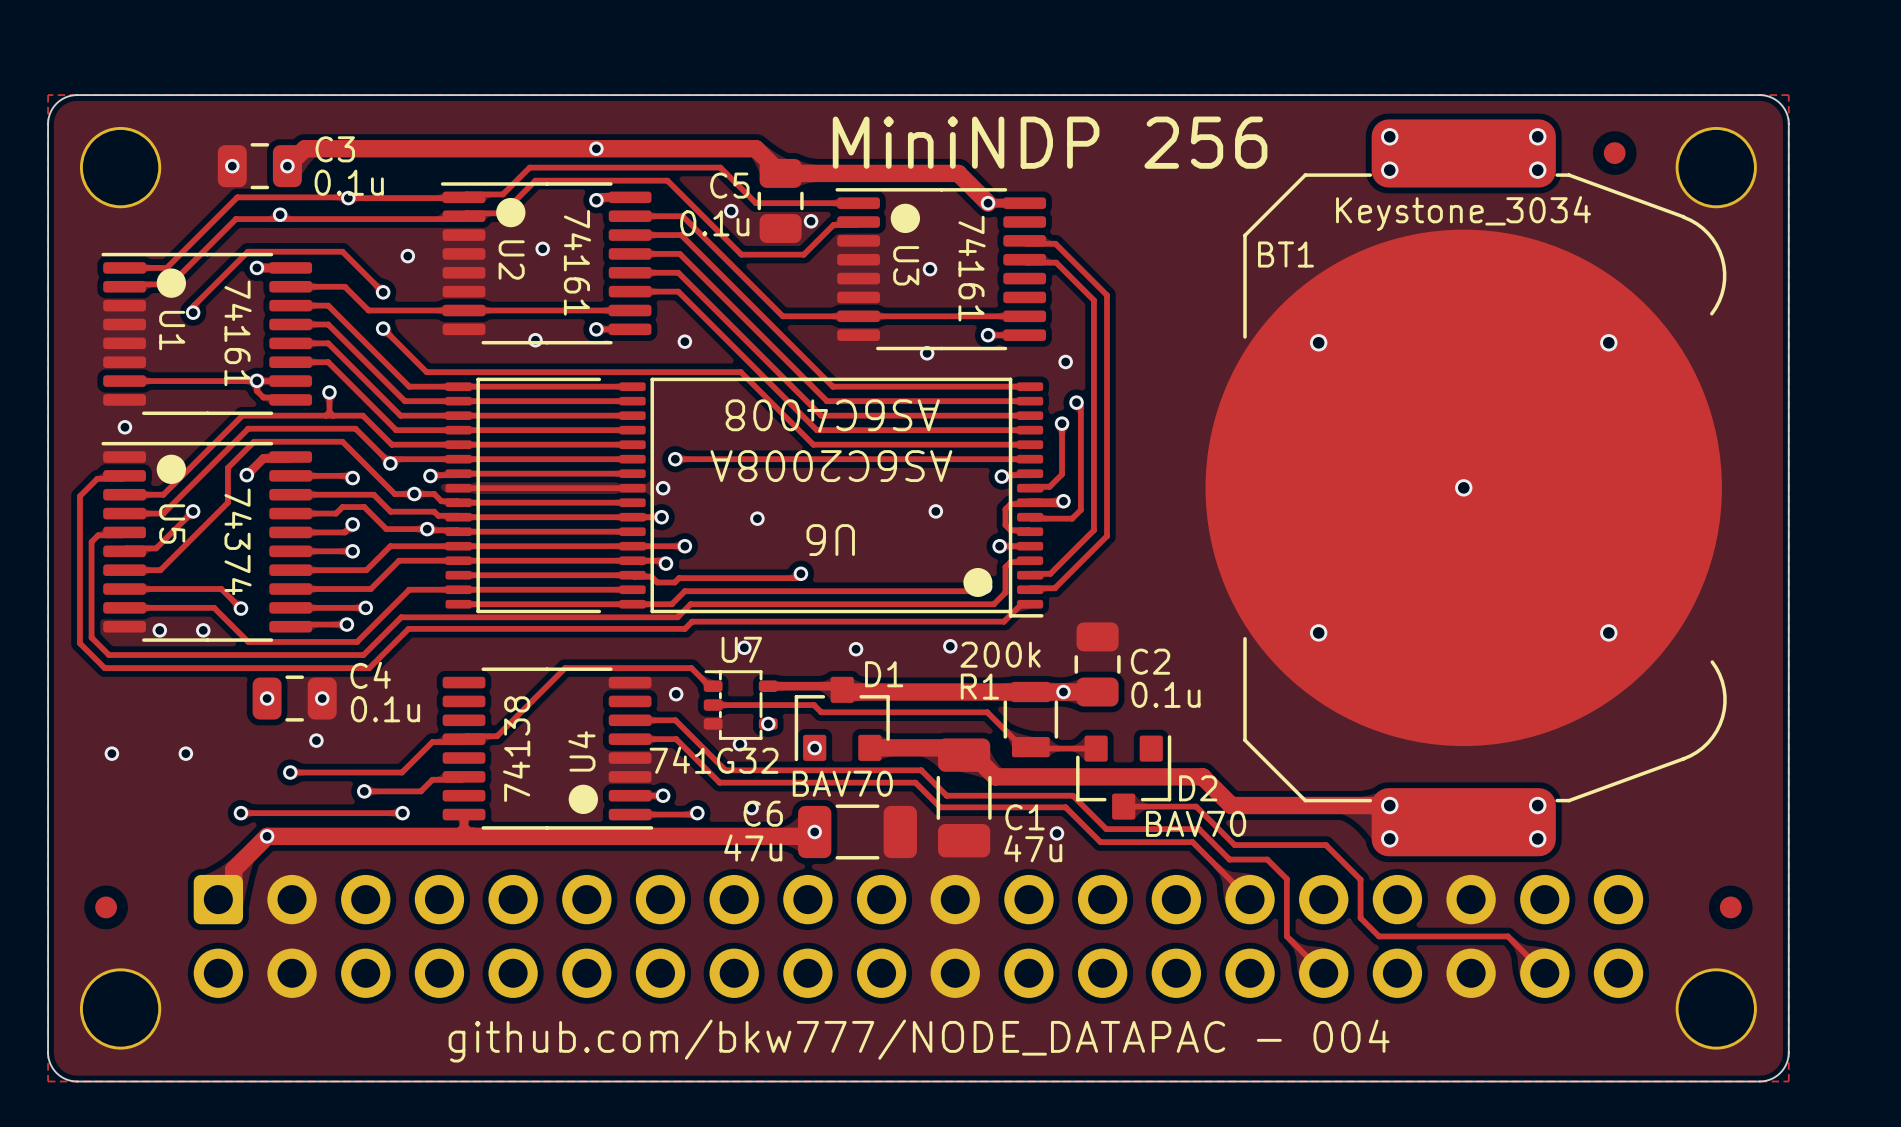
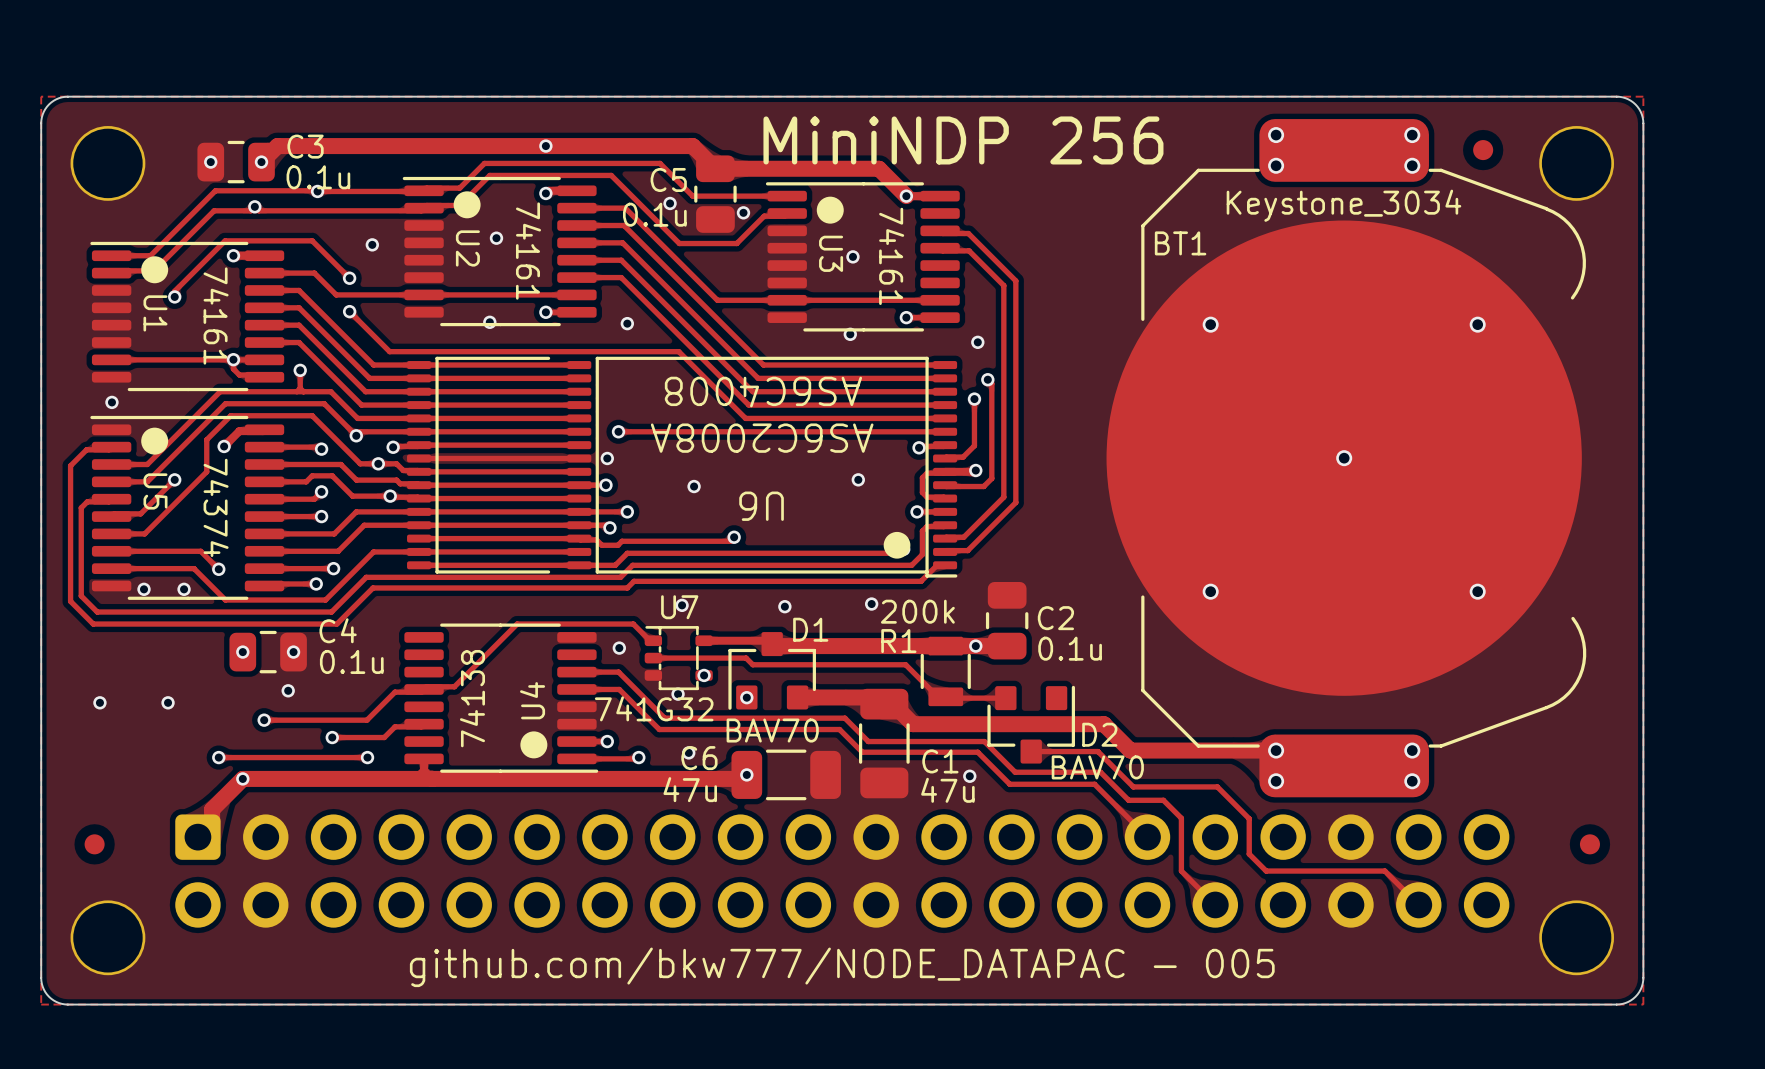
text: github.com/bkw777/NODE_DATAPAC - 004 (919, 1041) -> github.com/bkw777/NODE_DATAPAC - 005 (842, 967)

